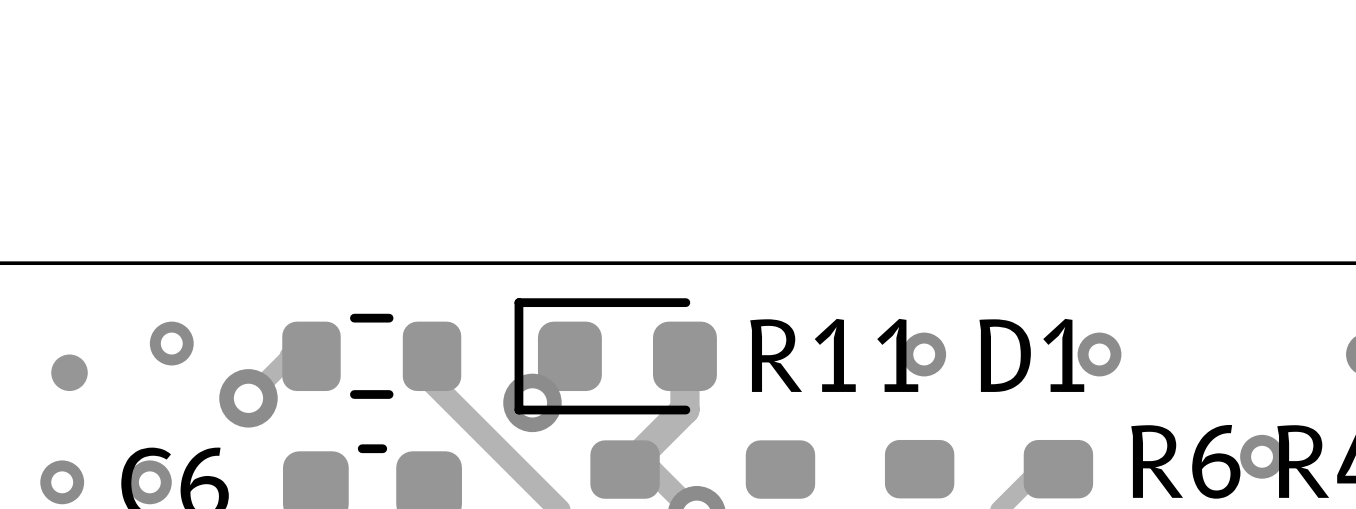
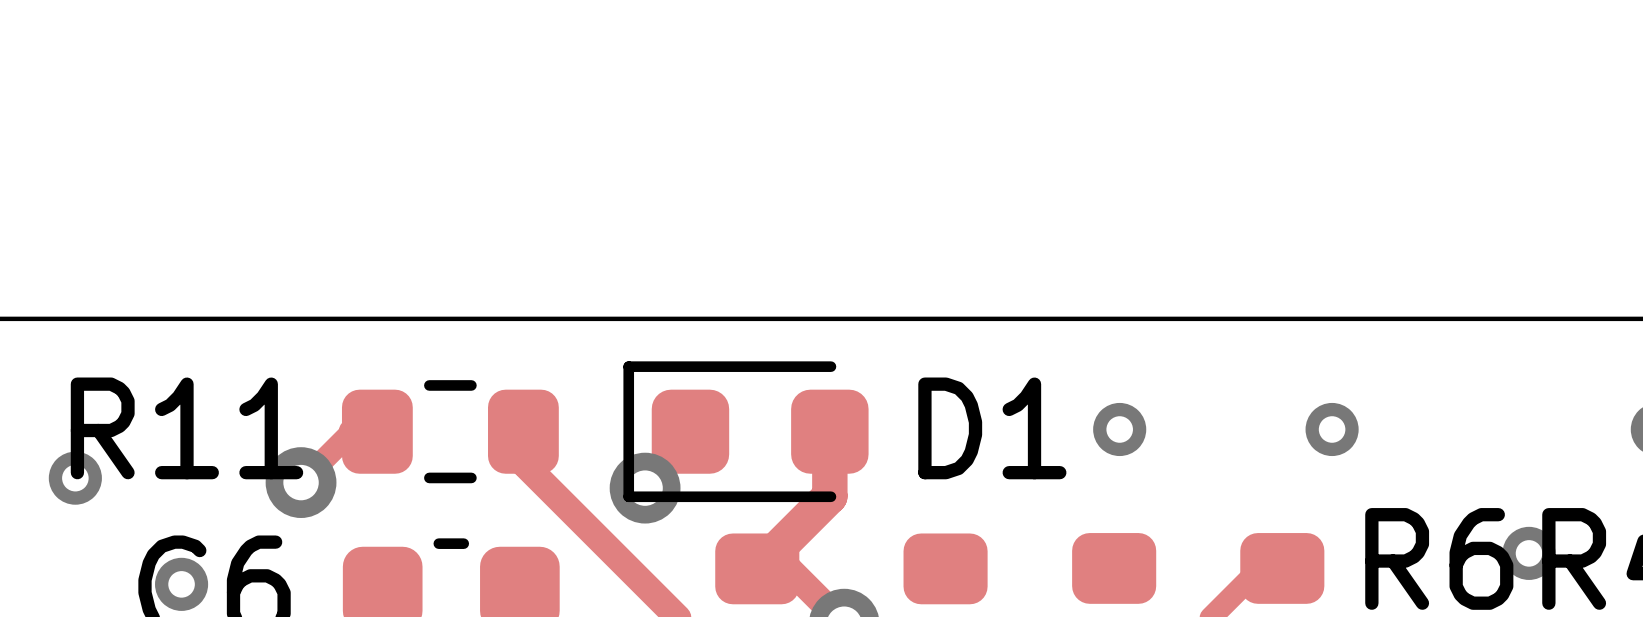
via: (171, 343) -> none
R11 name position: R11 (834, 355) -> R11 (186, 428)
D1 name position: D1 (1031, 355) -> D1 (992, 428)
part: (69, 372) -> none
via: none -> (75, 478)
via: (62, 482) -> none

